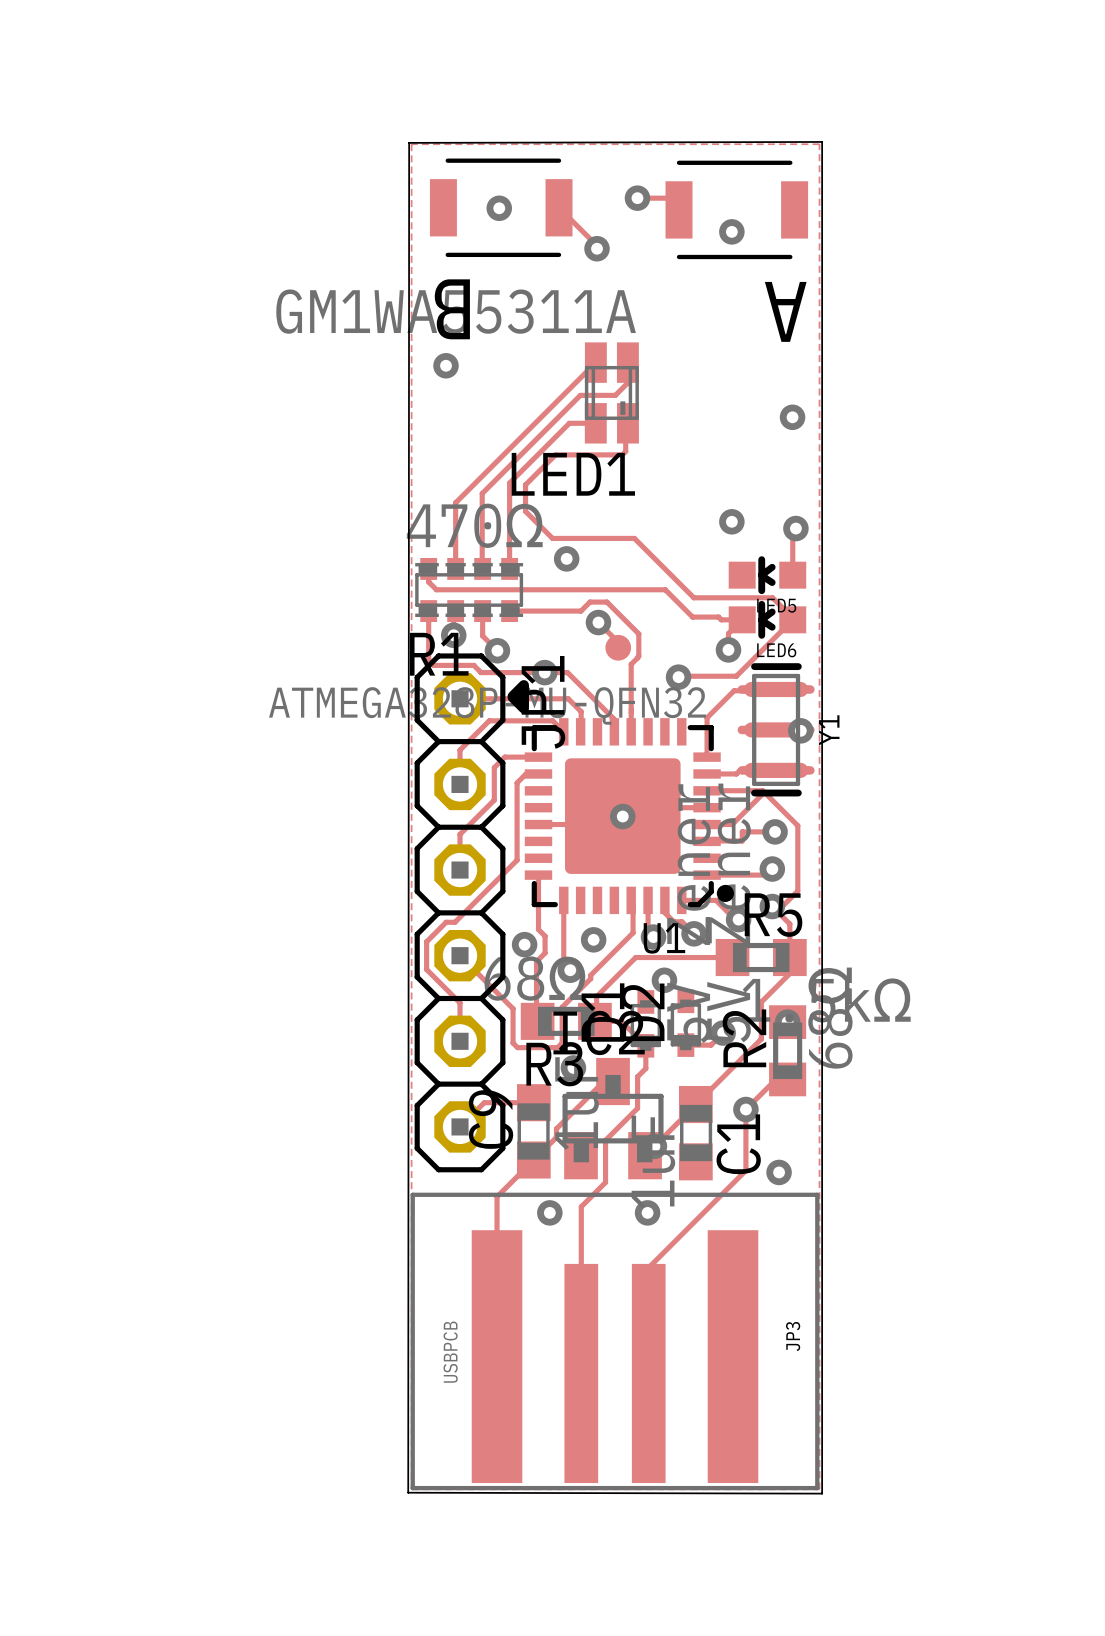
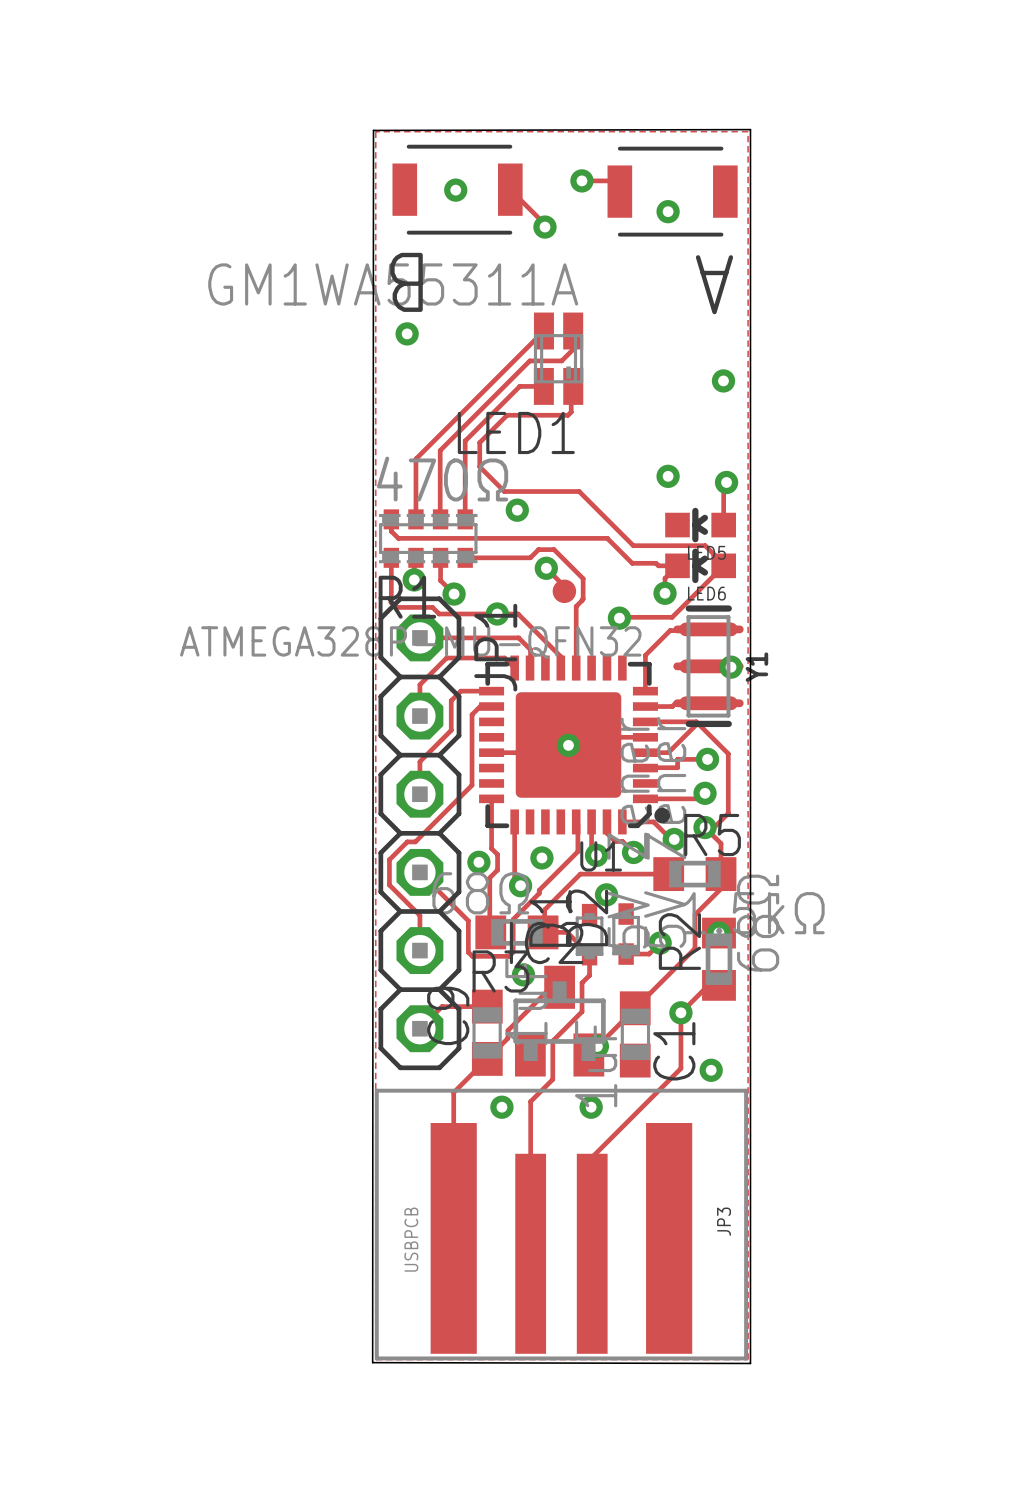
drawing: [507, 680, 529, 714] -> none

